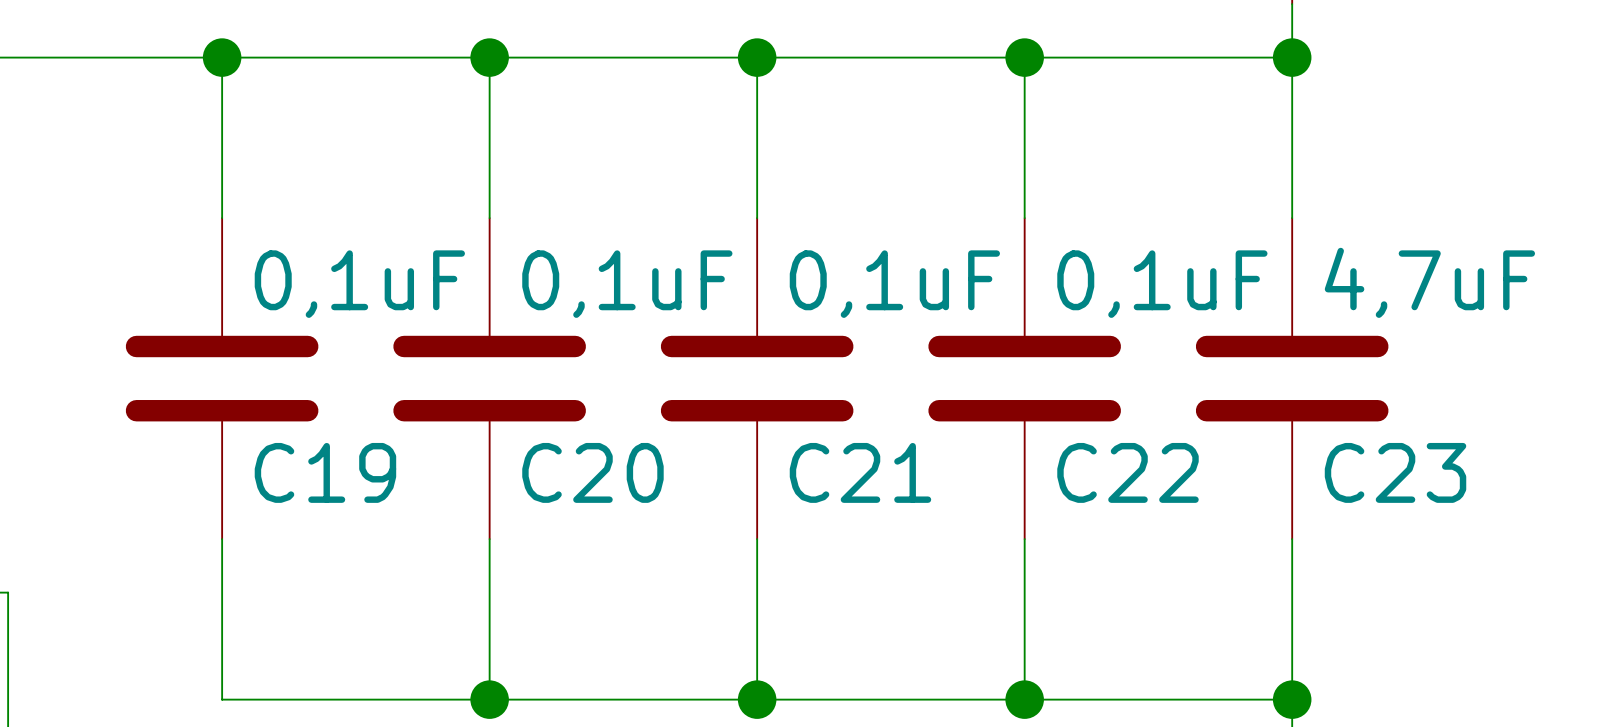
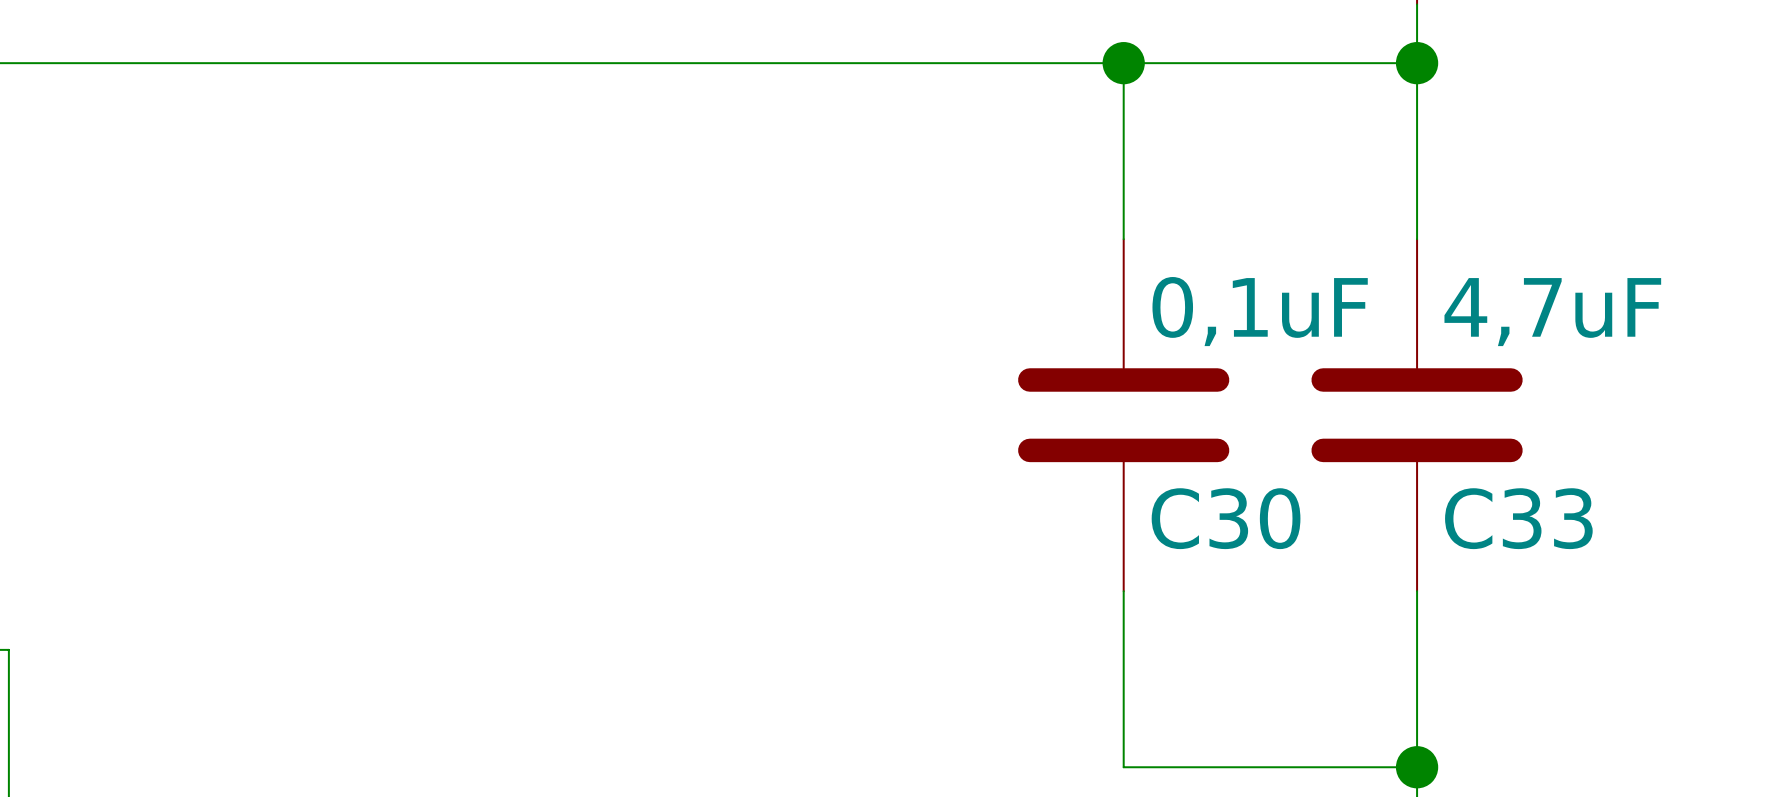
wire: (222, 57) (222, 218) -> none
junction: (222, 57) -> none
wire: (489, 57) (489, 218) -> none
junction: (489, 57) -> none
wire: (757, 57) (757, 218) -> none
junction: (757, 57) -> none
C19: 0,1uF (222, 378) -> none
C20: 0,1uF (489, 378) -> none
C21: 0,1uF (757, 378) -> none
C22 name: C22 (1128, 472) -> C30 (1226, 518)
C23 name: C23 (1395, 472) -> C33 (1518, 518)
wire: (222, 539) (222, 699) (1024, 699) -> none
wire: (489, 539) (489, 699) -> none
wire: (757, 539) (757, 699) -> none
junction: (489, 699) -> none
junction: (757, 699) -> none
junction: (1024, 699) -> none

